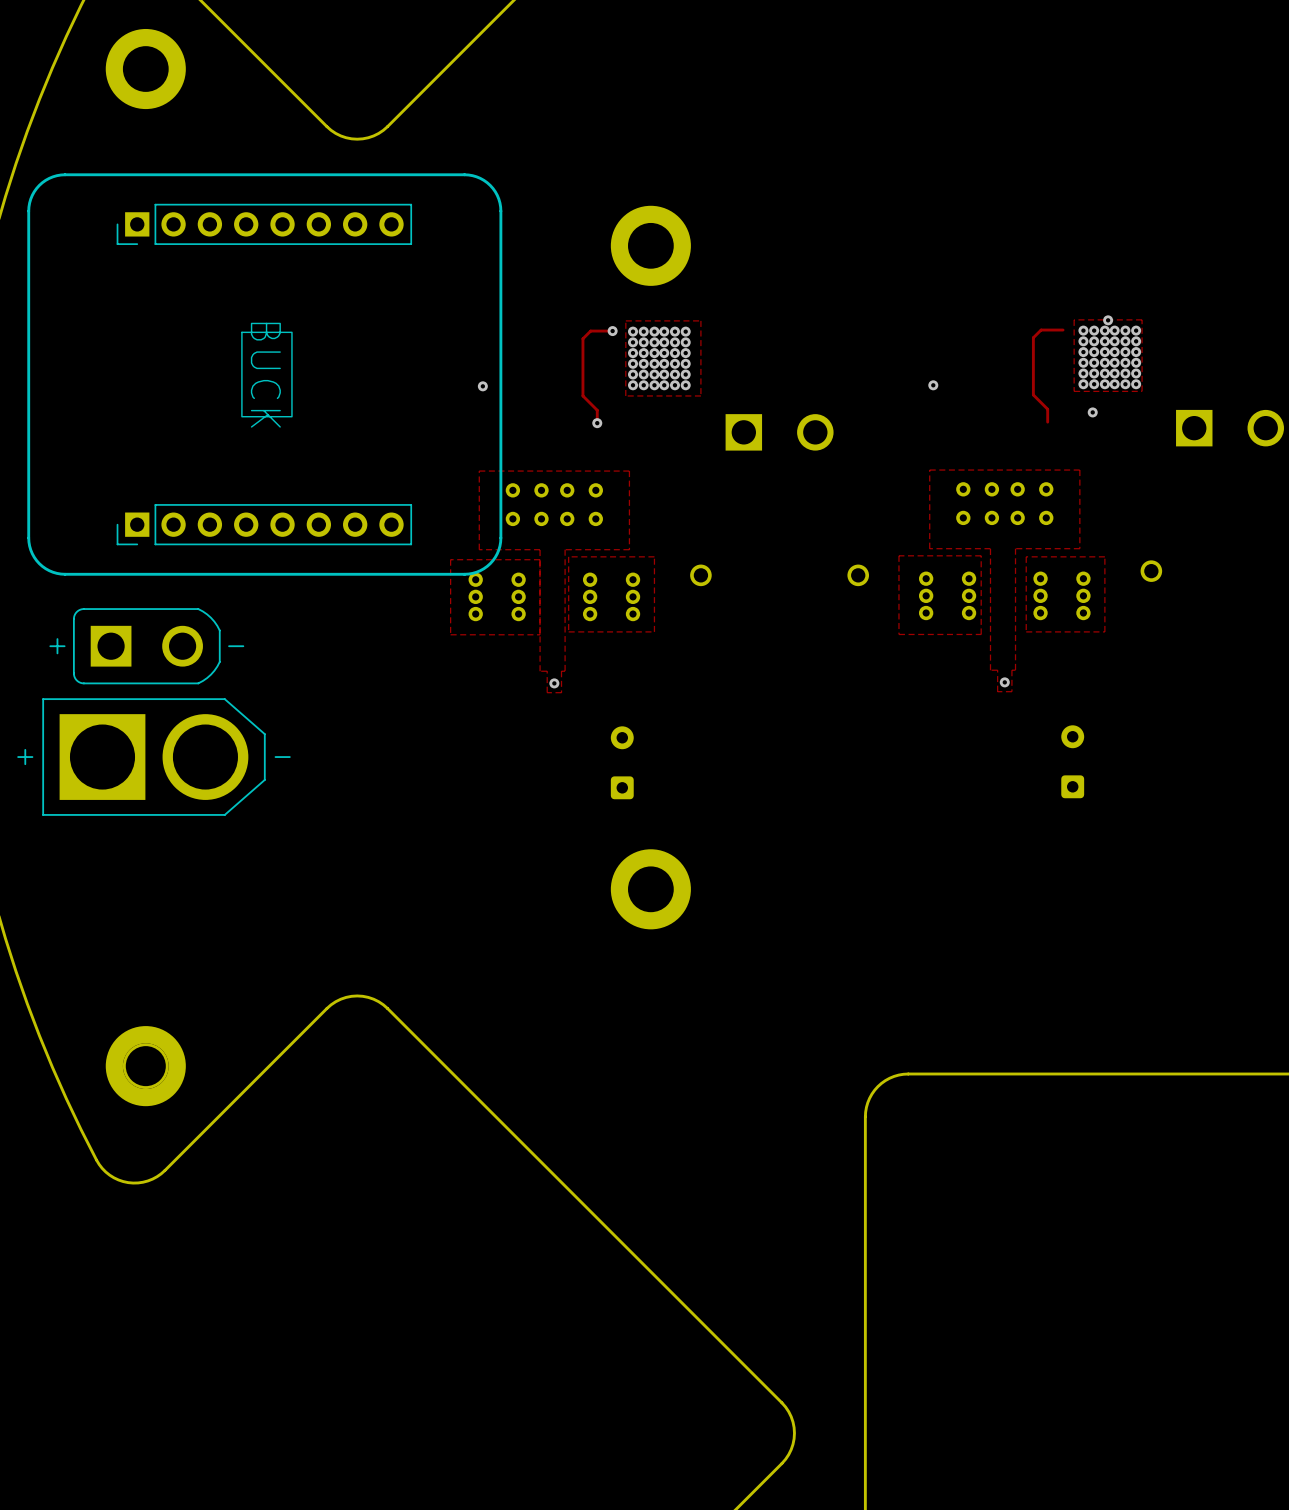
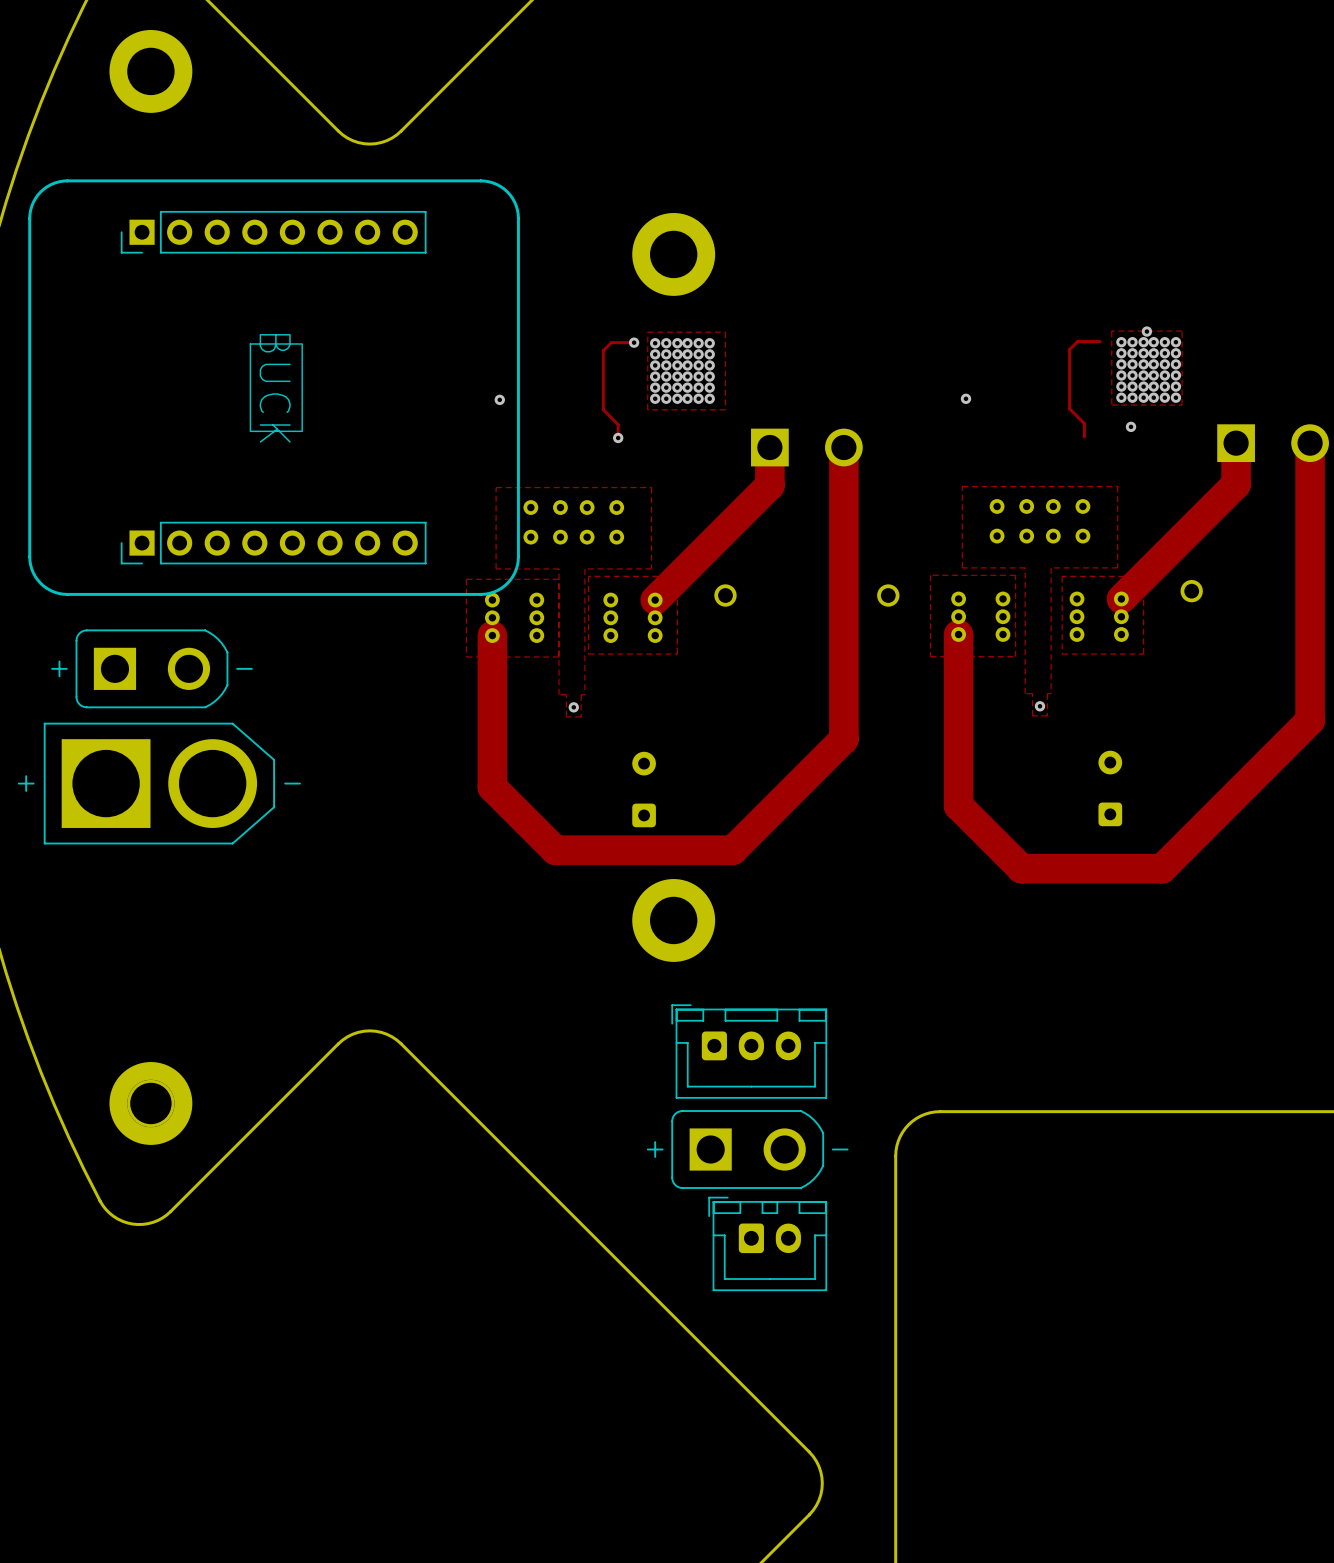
track: none -> (1236, 443) (1236, 484) (1121, 598)
track: none -> (1310, 443) (1310, 720) (1162, 868) (1021, 868) (958, 805) (958, 634)
track: none -> (769, 447) (769, 485) (655, 600)
track: none -> (843, 447) (843, 739) (732, 850) (555, 850) (492, 787) (492, 635)
part: none -> (749, 1051)
part: none -> (747, 1149)
part: none -> (767, 1243)

